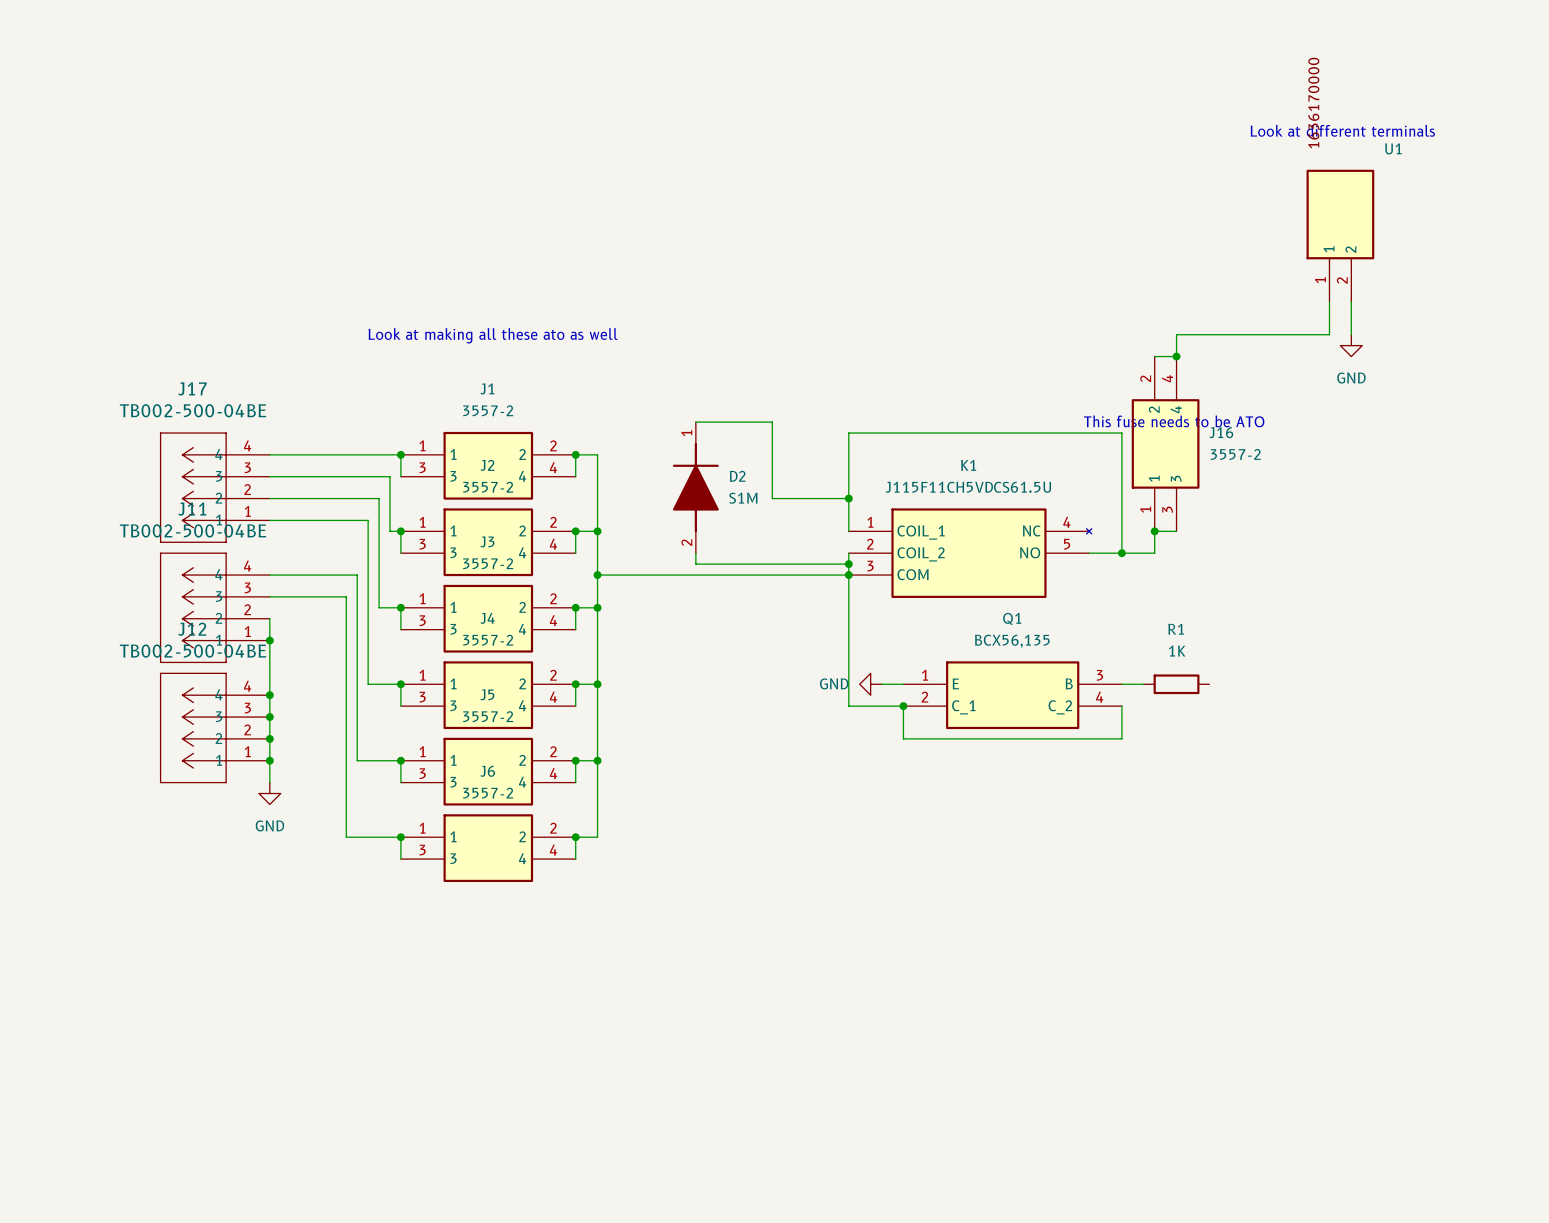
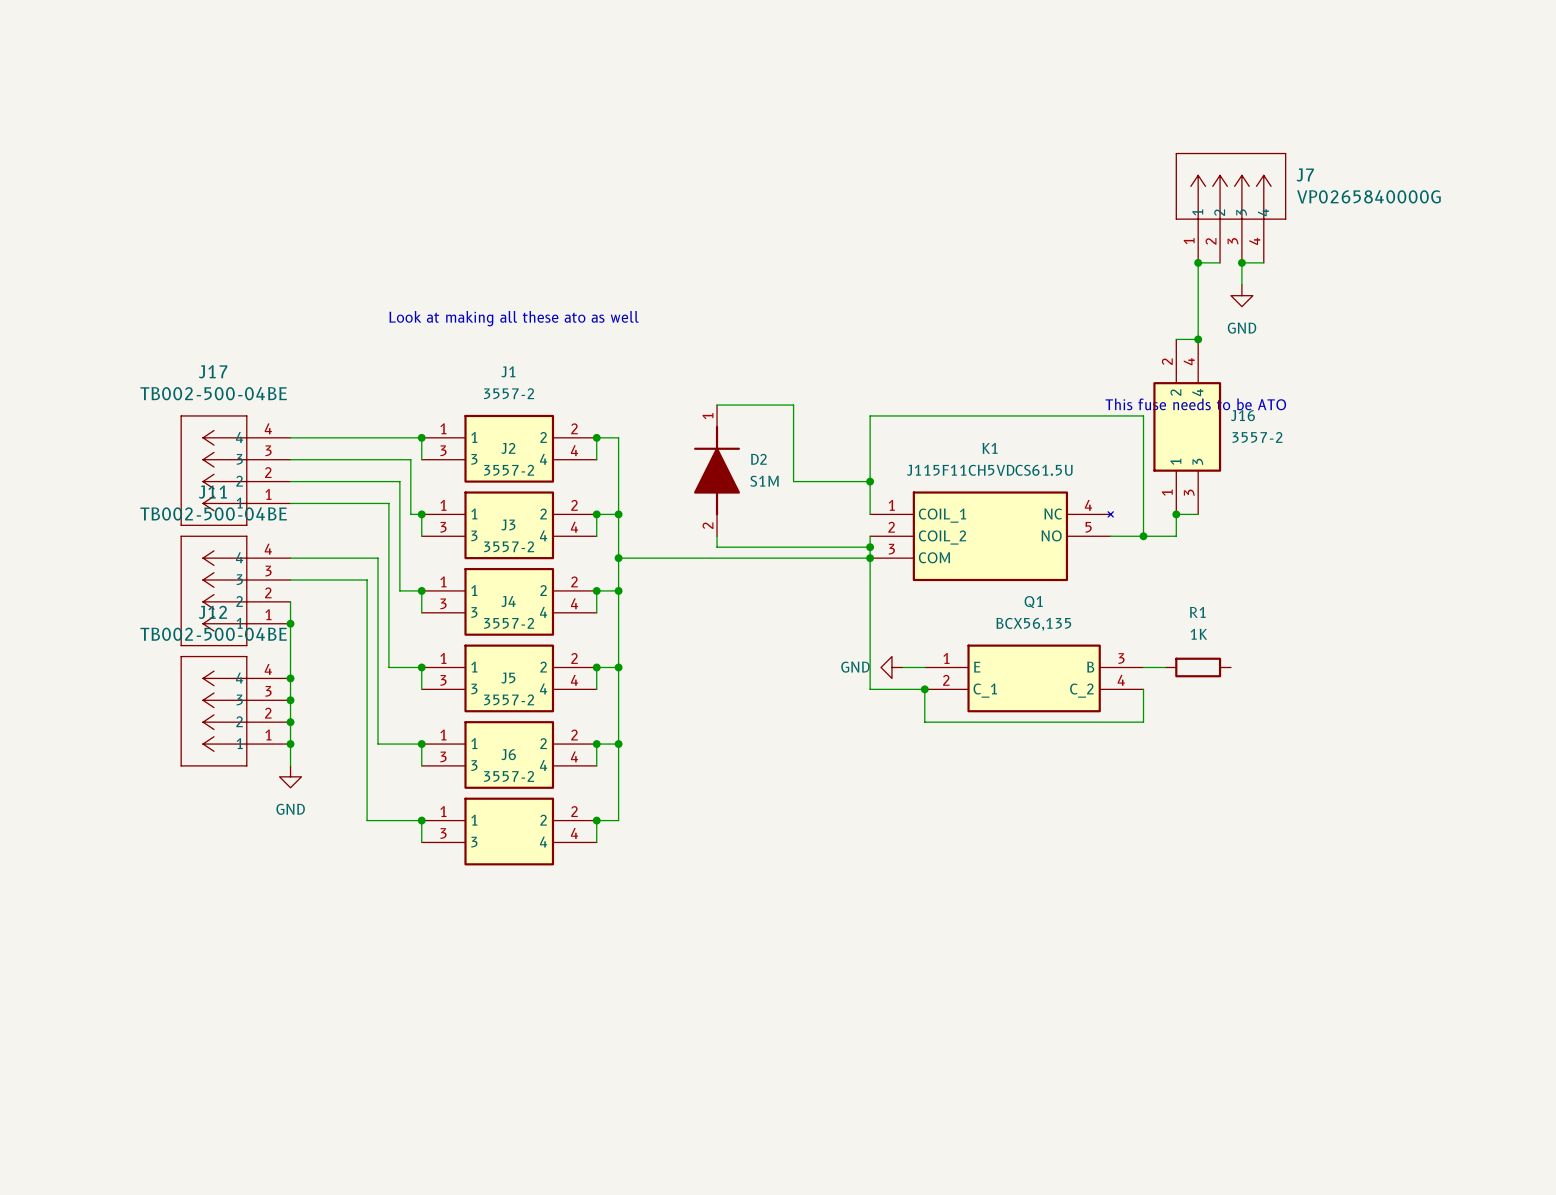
text: Look at different terminals (1342, 130) -> none
J7: none -> VP0265840000G (1230, 207)
U1: (1340, 235) -> none
junction: none -> (1198, 262)
junction: none -> (1241, 262)
wire: none -> (1263, 262) (1241, 262) (1241, 284)
wire: (1329, 301) (1329, 334) (1176, 334) -> (1220, 262) (1198, 262) (1198, 317)
wire: (1351, 301) (1351, 334) -> none
power symbol position: GND (1351, 345) -> GND (1241, 295)

